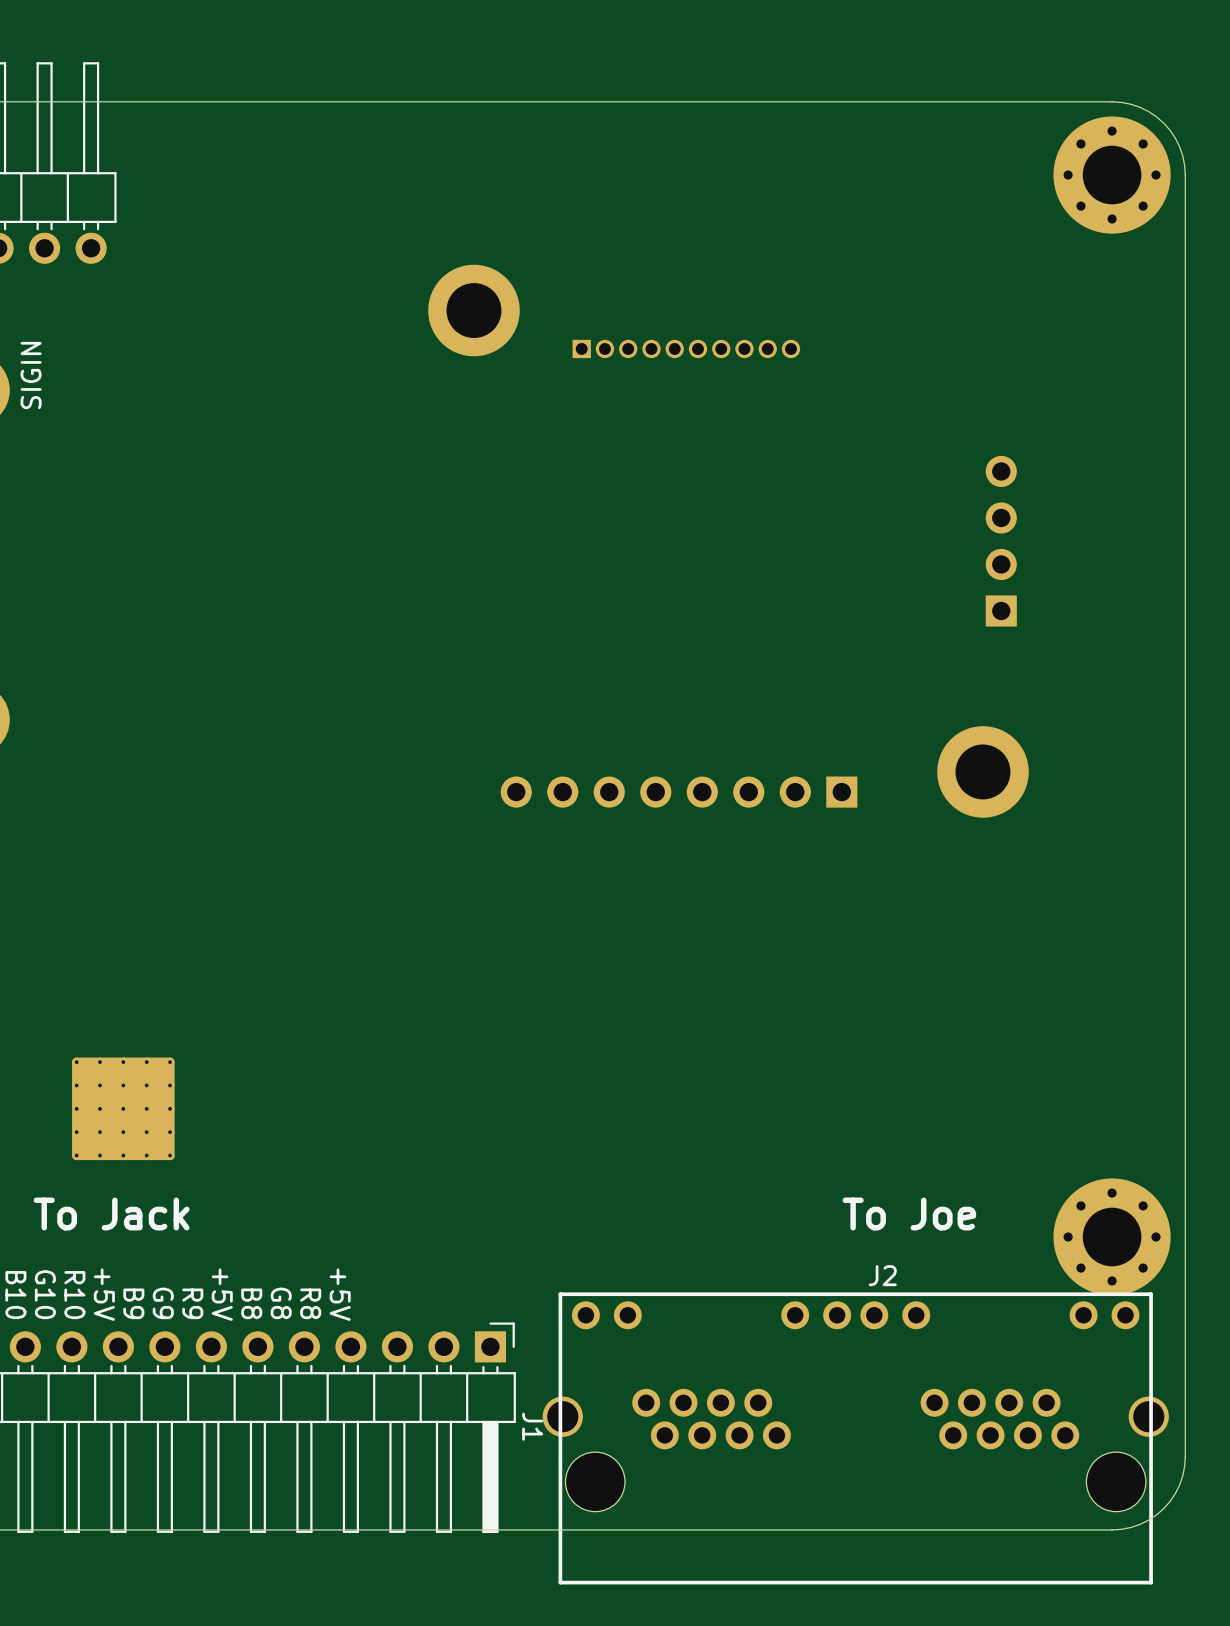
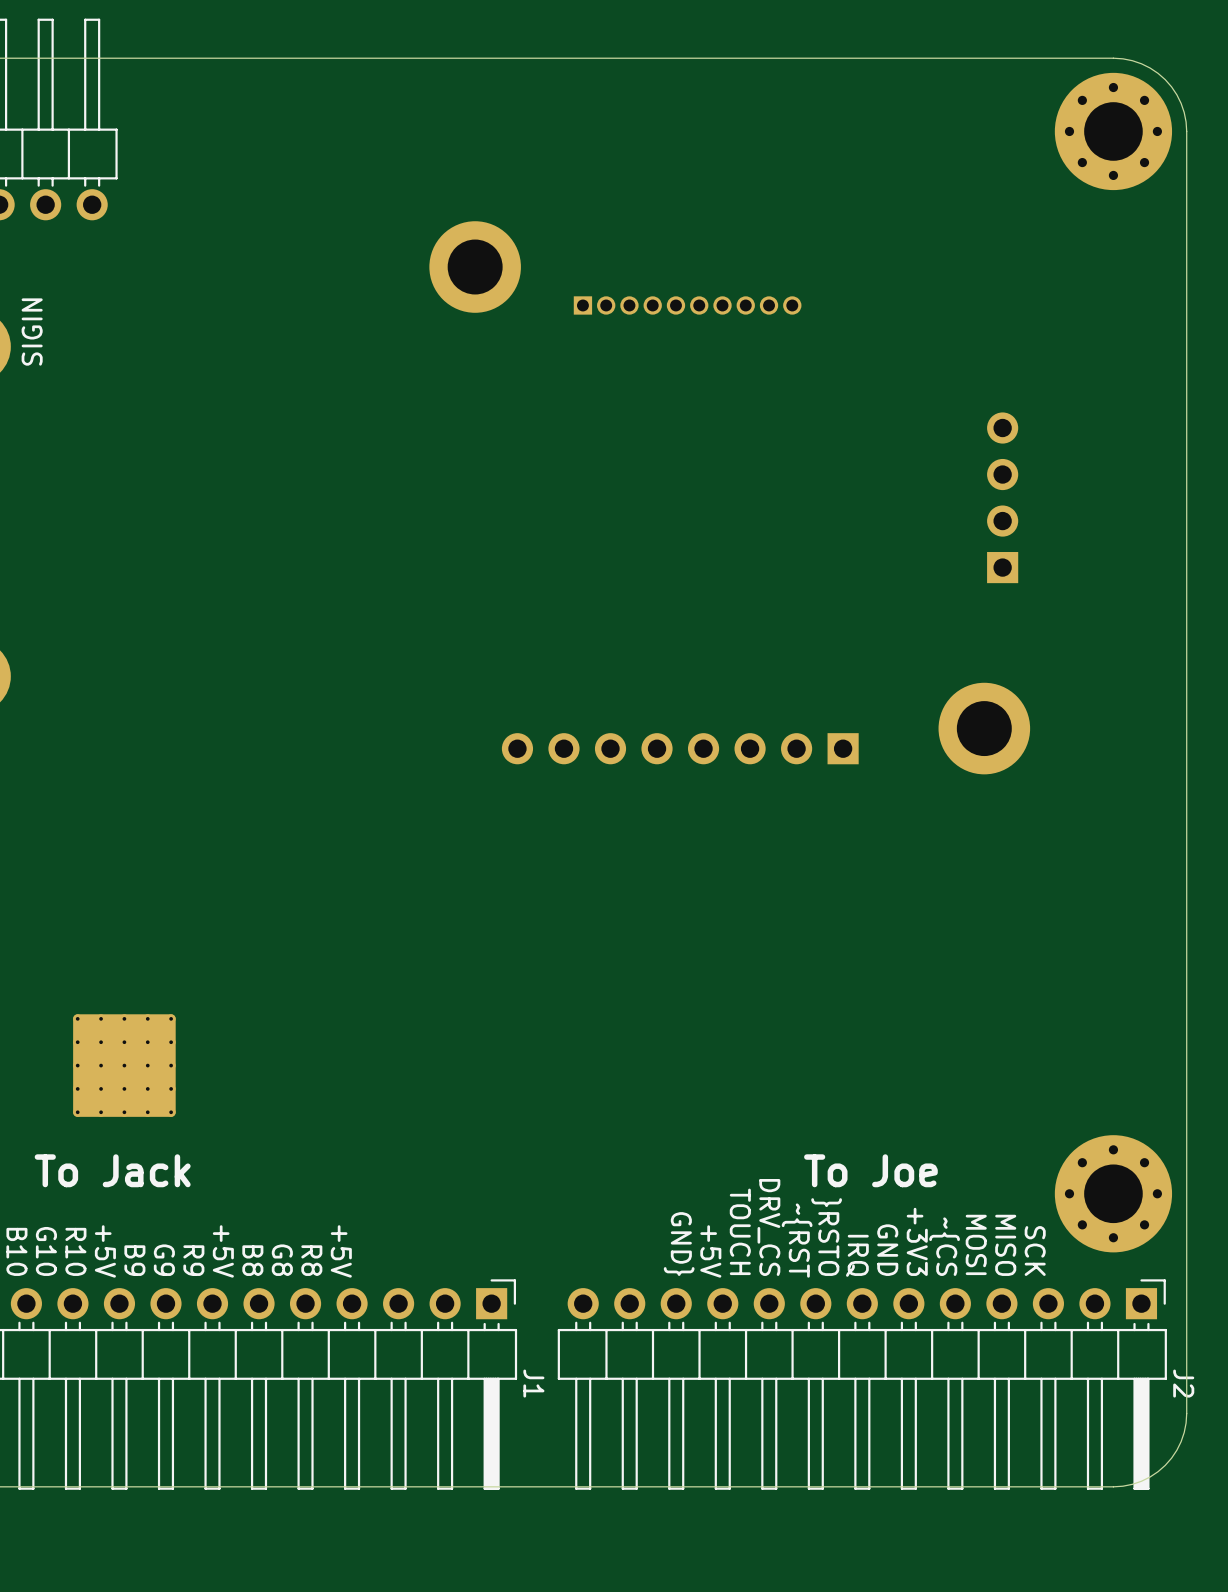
text position: To Joe (909, 1214) -> To Joe (870, 1170)
text: none -> DRV_CS (768, 1227)
text: none -> TOUCH (740, 1231)
J2 name position: J2 (882, 1275) -> J2 (1183, 1383)
text: none -> }RSTO (826, 1237)
text: none -> ~{RST (797, 1240)
text: none -> +3V3 (917, 1241)
text: none -> GND} (679, 1244)
text: none -> MOSI (976, 1244)
text: none -> MISO (1005, 1245)
text: none -> ~{CS (944, 1246)
J2 footprint: [542, 1292, 1169, 1585] -> [557, 1279, 1167, 1490]
text: none -> GND (887, 1250)
text: none -> +5V (710, 1251)
text: none -> SCK (1035, 1251)
text: none -> IRQ (857, 1255)

